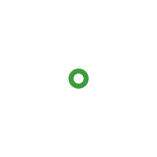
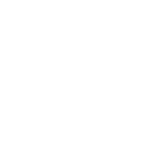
via: (78, 78) -> none

